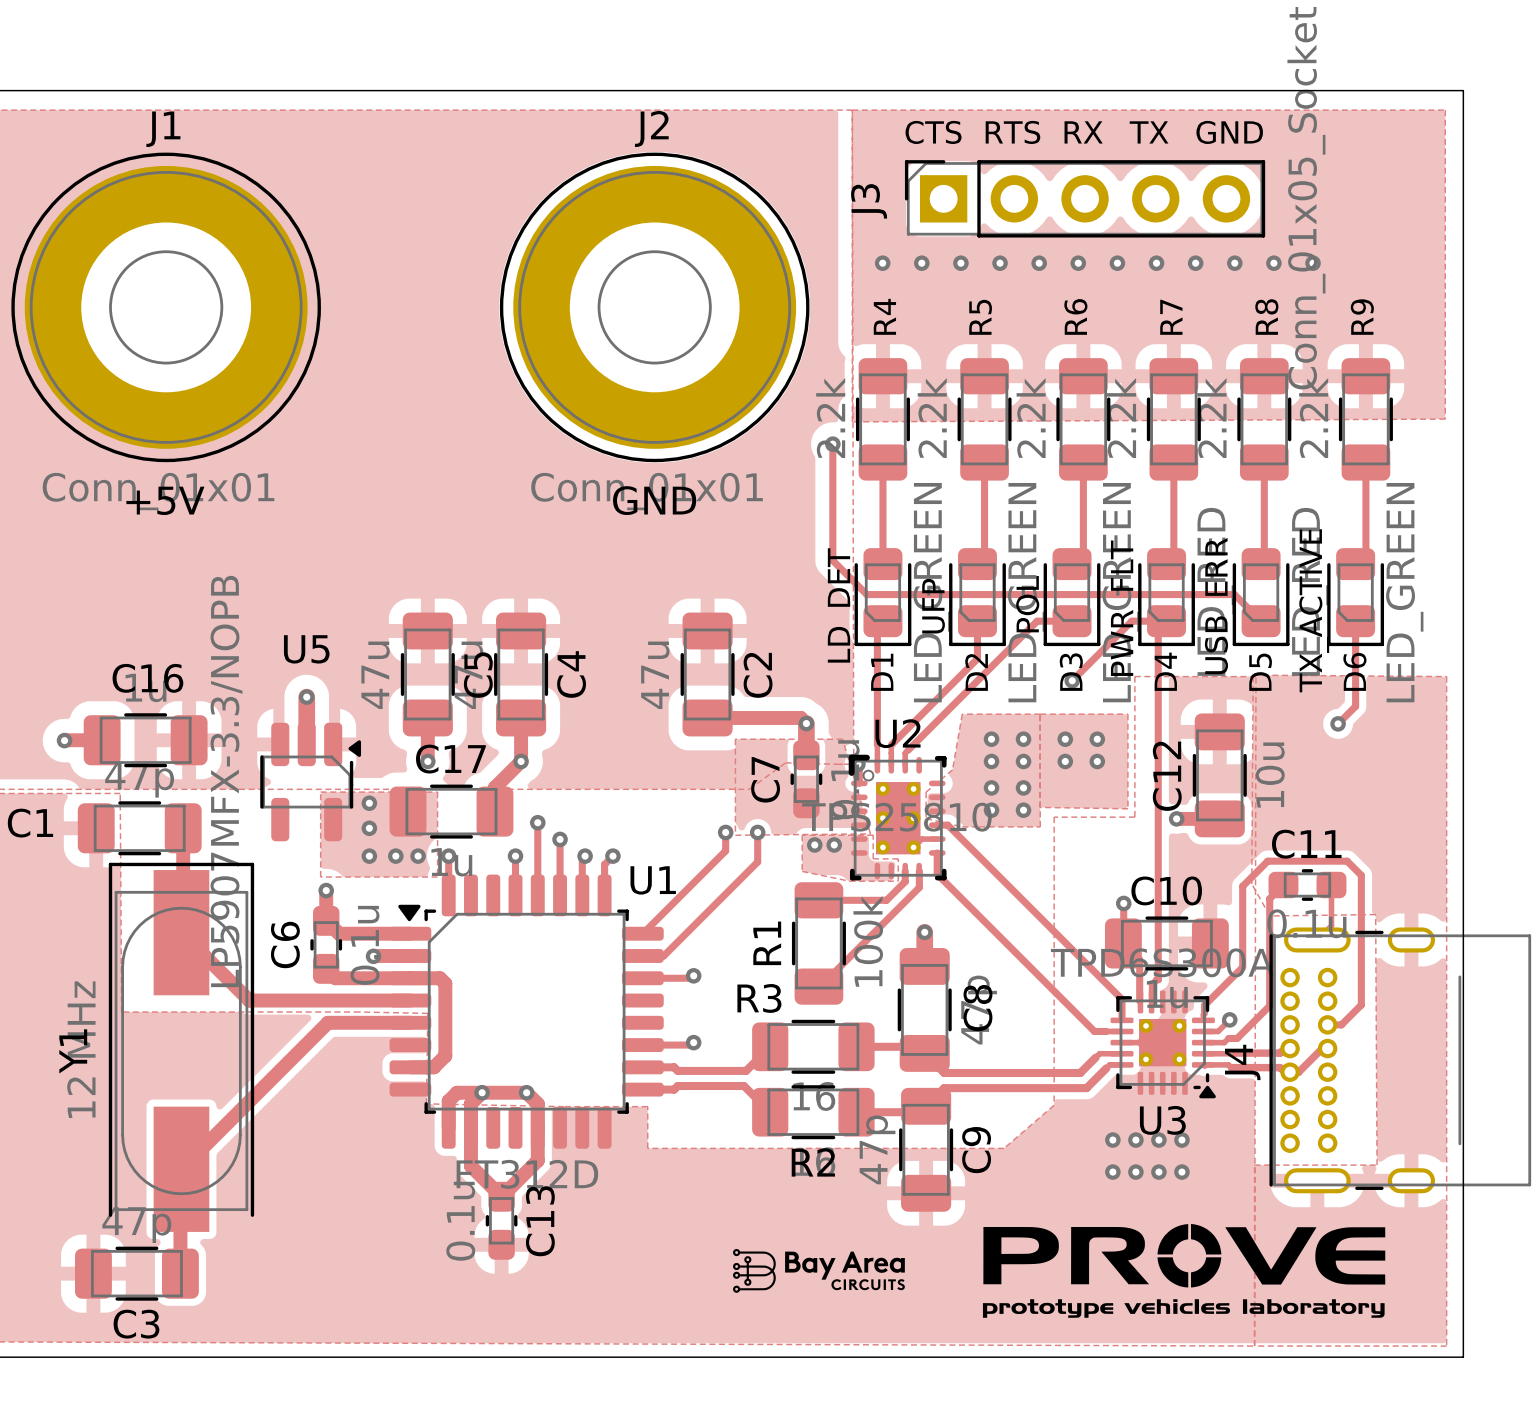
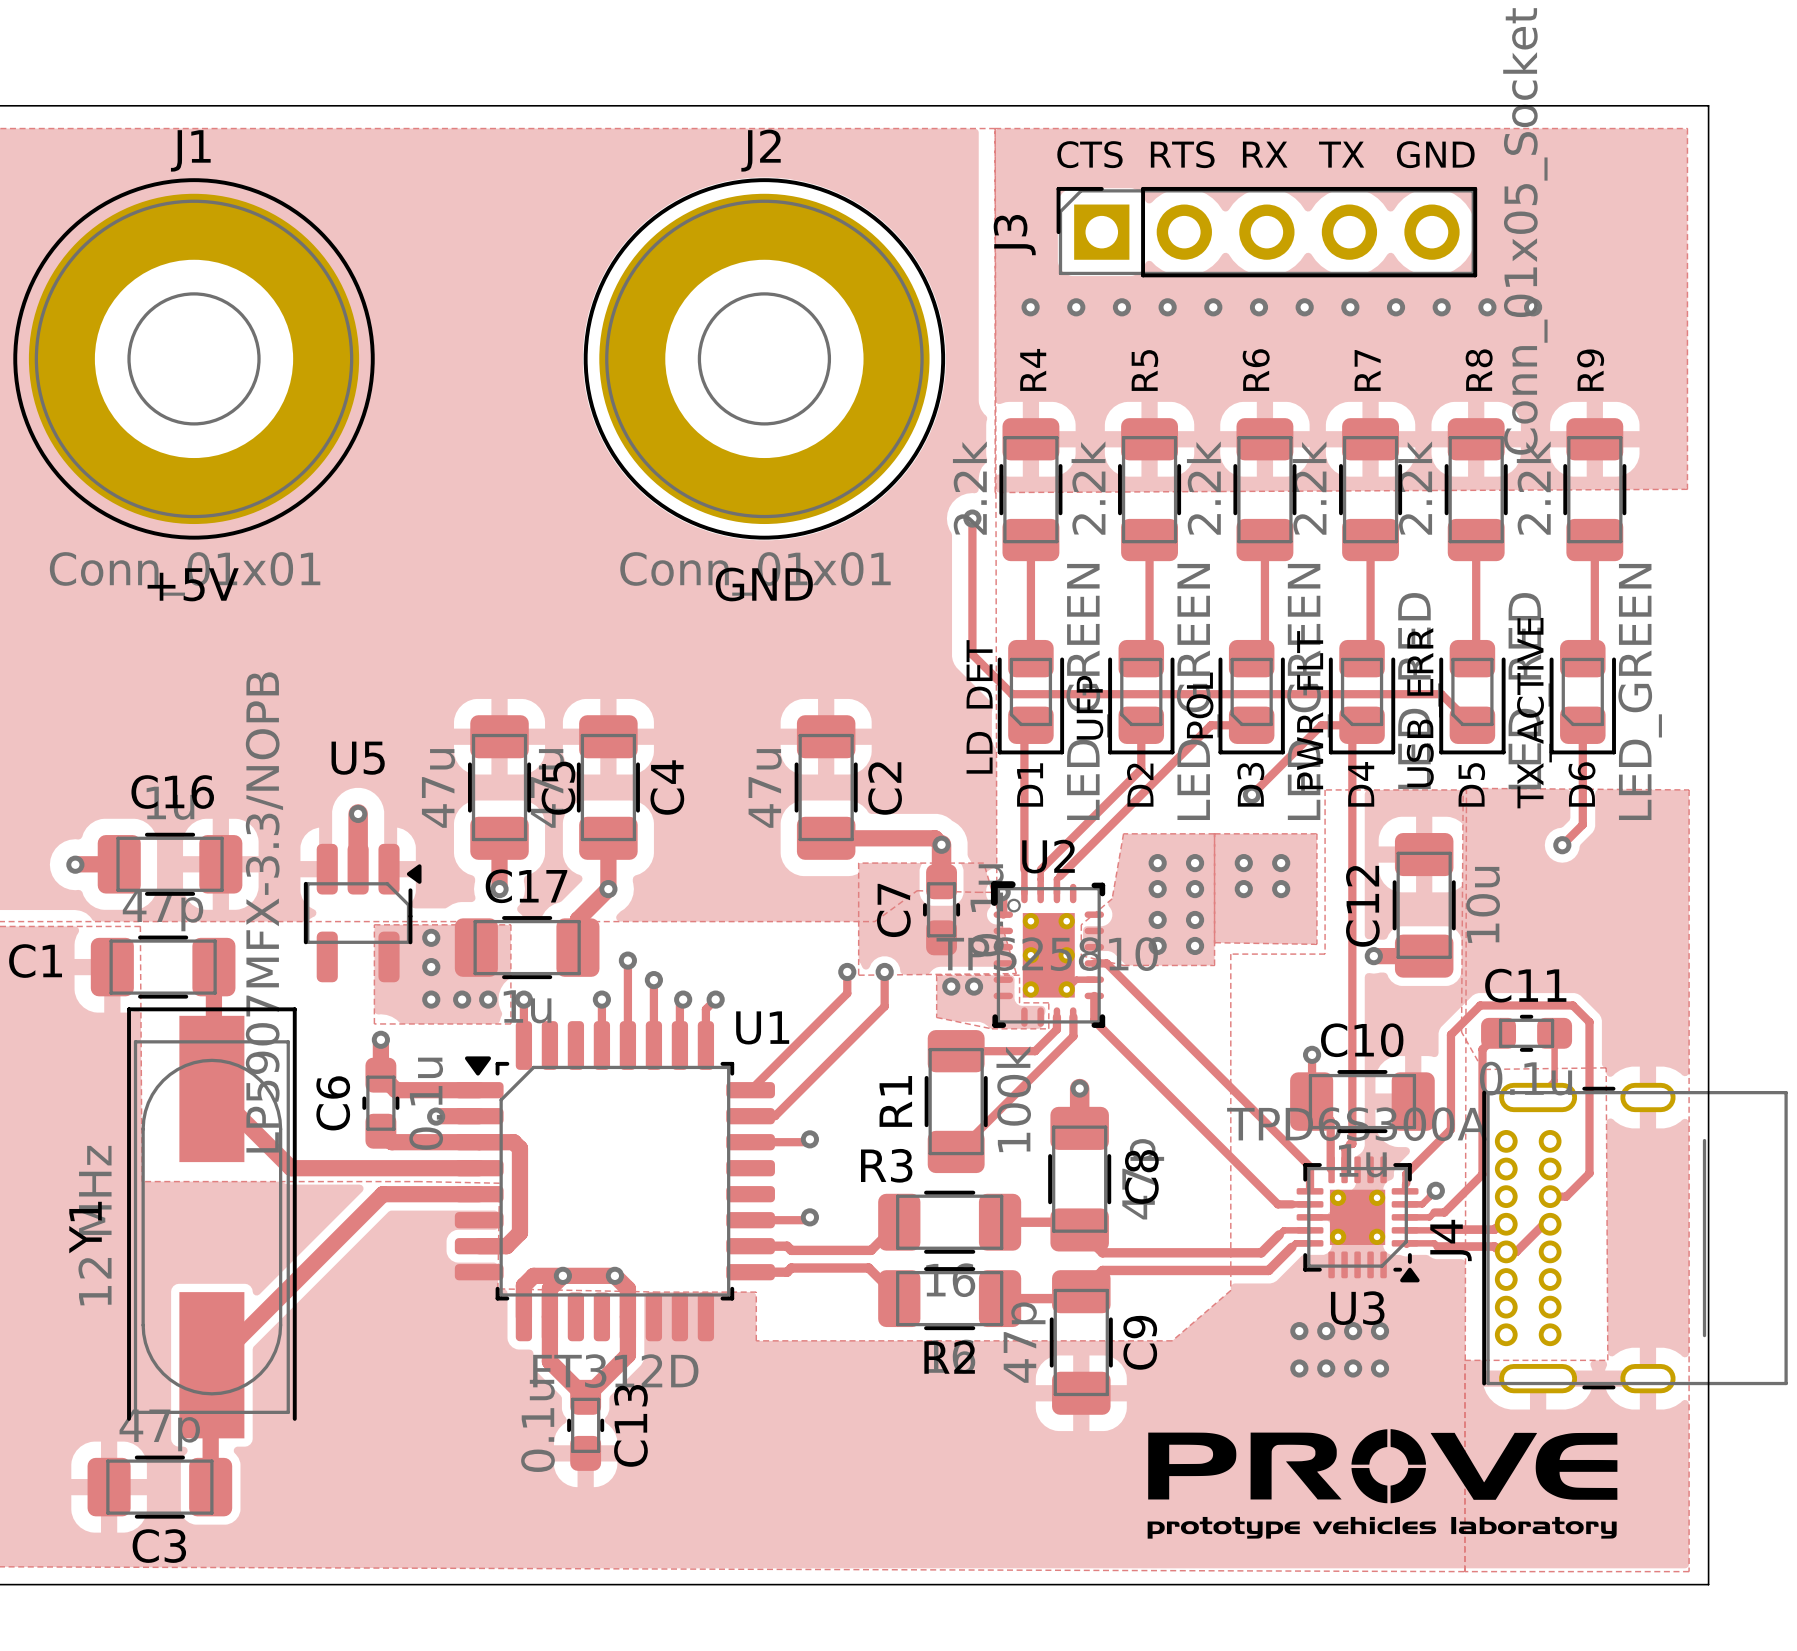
drawing: [733, 1249, 905, 1293] -> none

